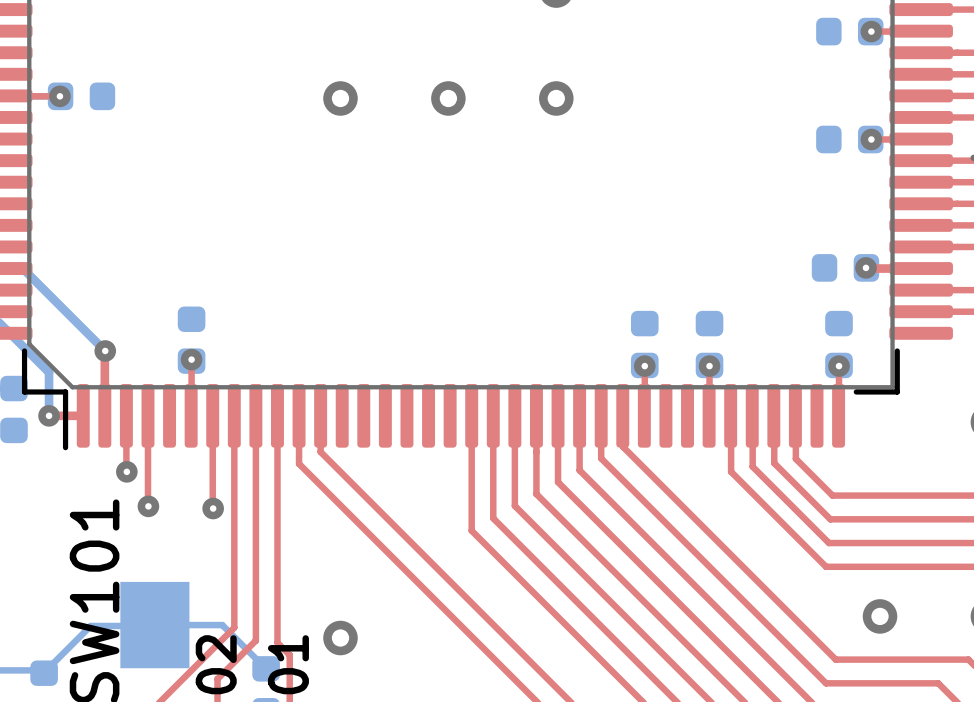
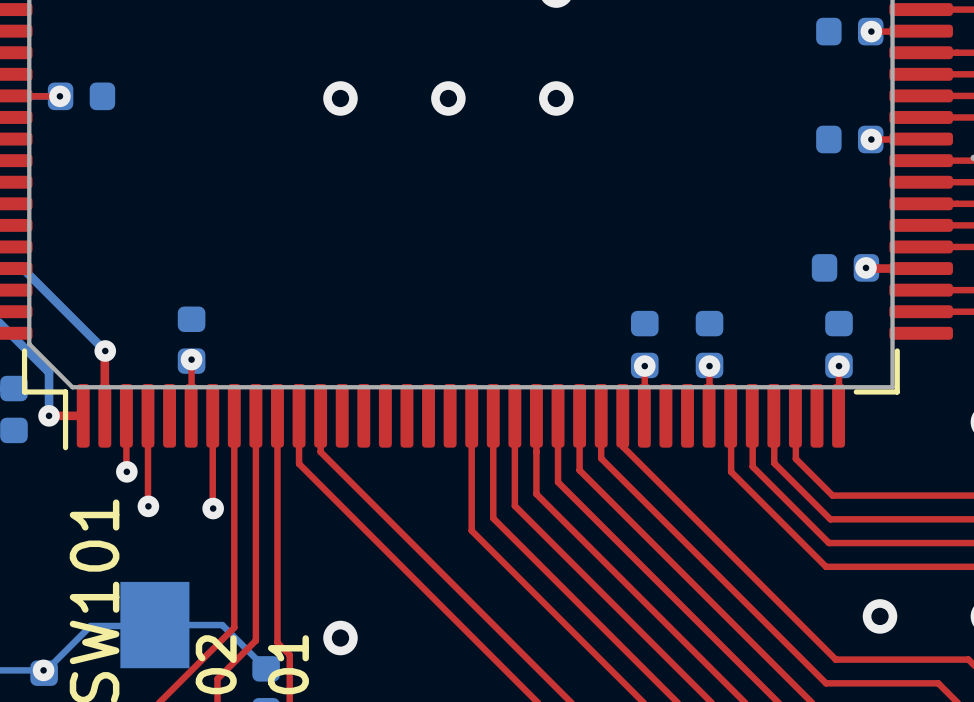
via: none -> (43, 670)

